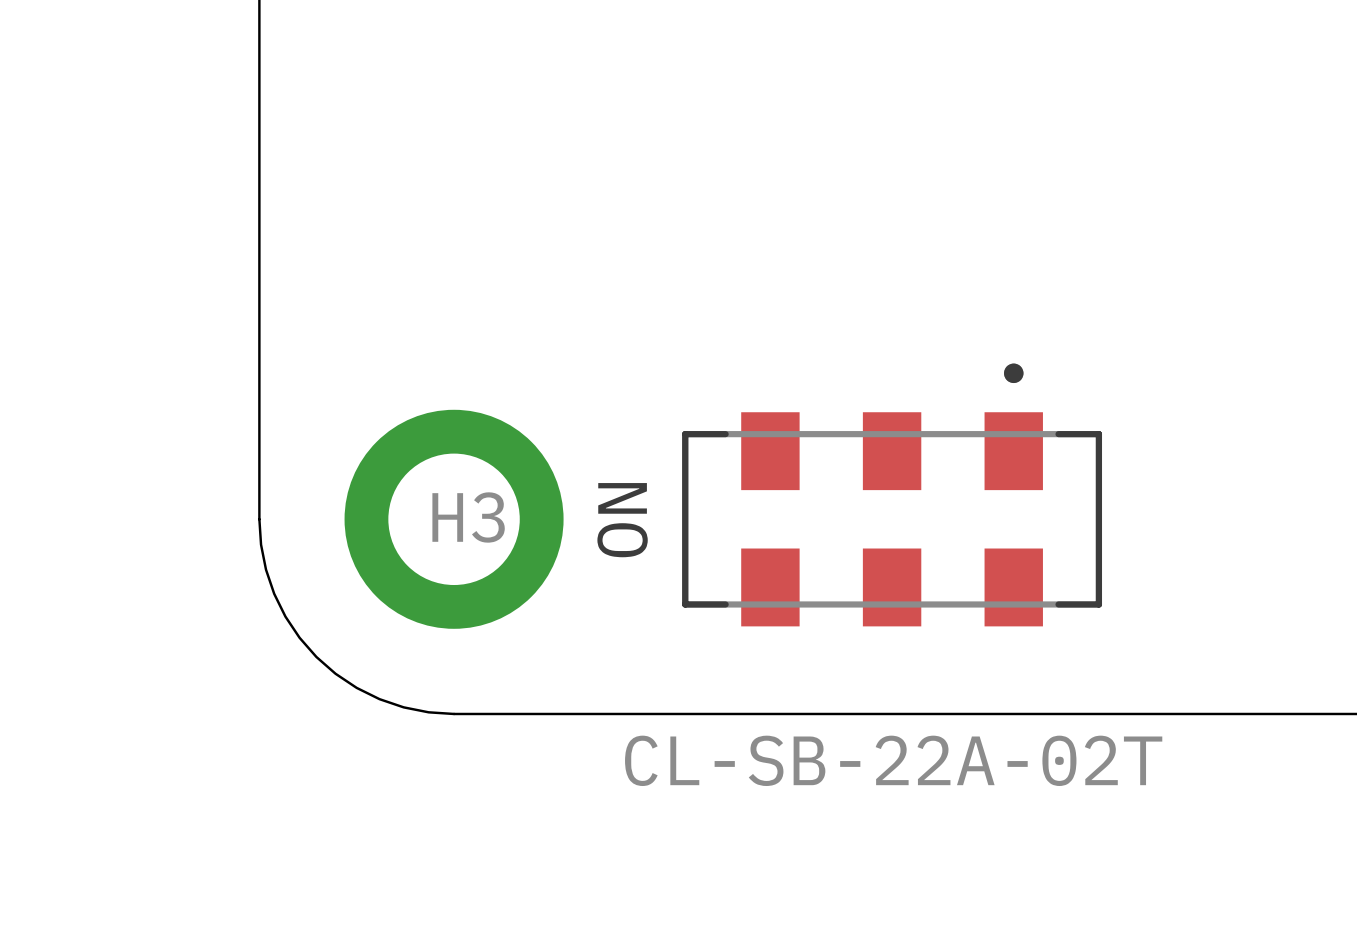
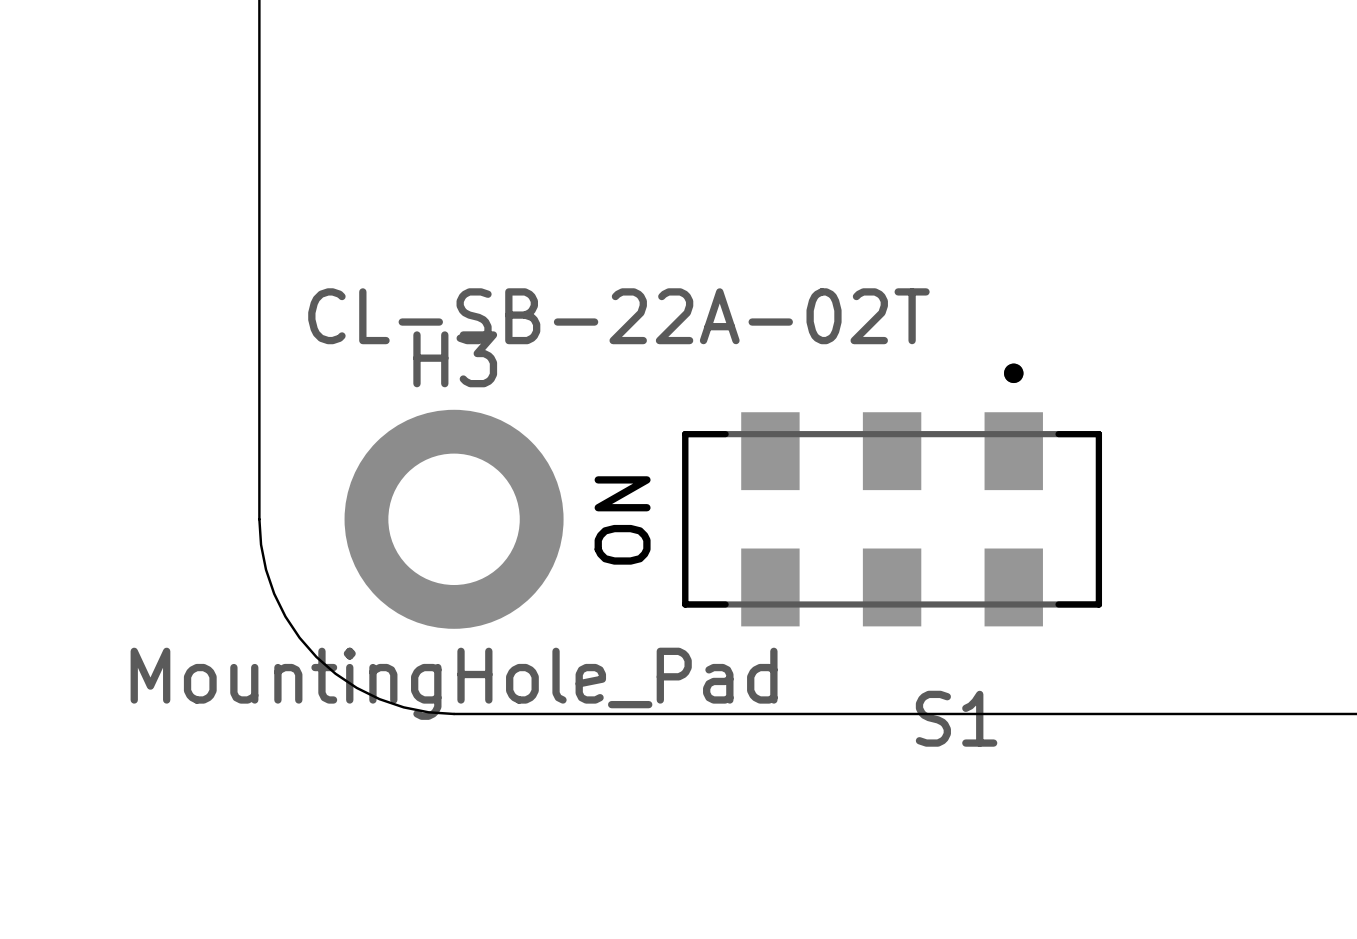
H3 name position: H3 (468, 517) -> H3 (455, 359)
H3 value: none -> MountingHole_Pad (454, 683)
S1 name: none -> S1 (956, 718)
S1 value position: CL-SB-22A-02T (893, 760) -> CL-SB-22A-02T (618, 316)

